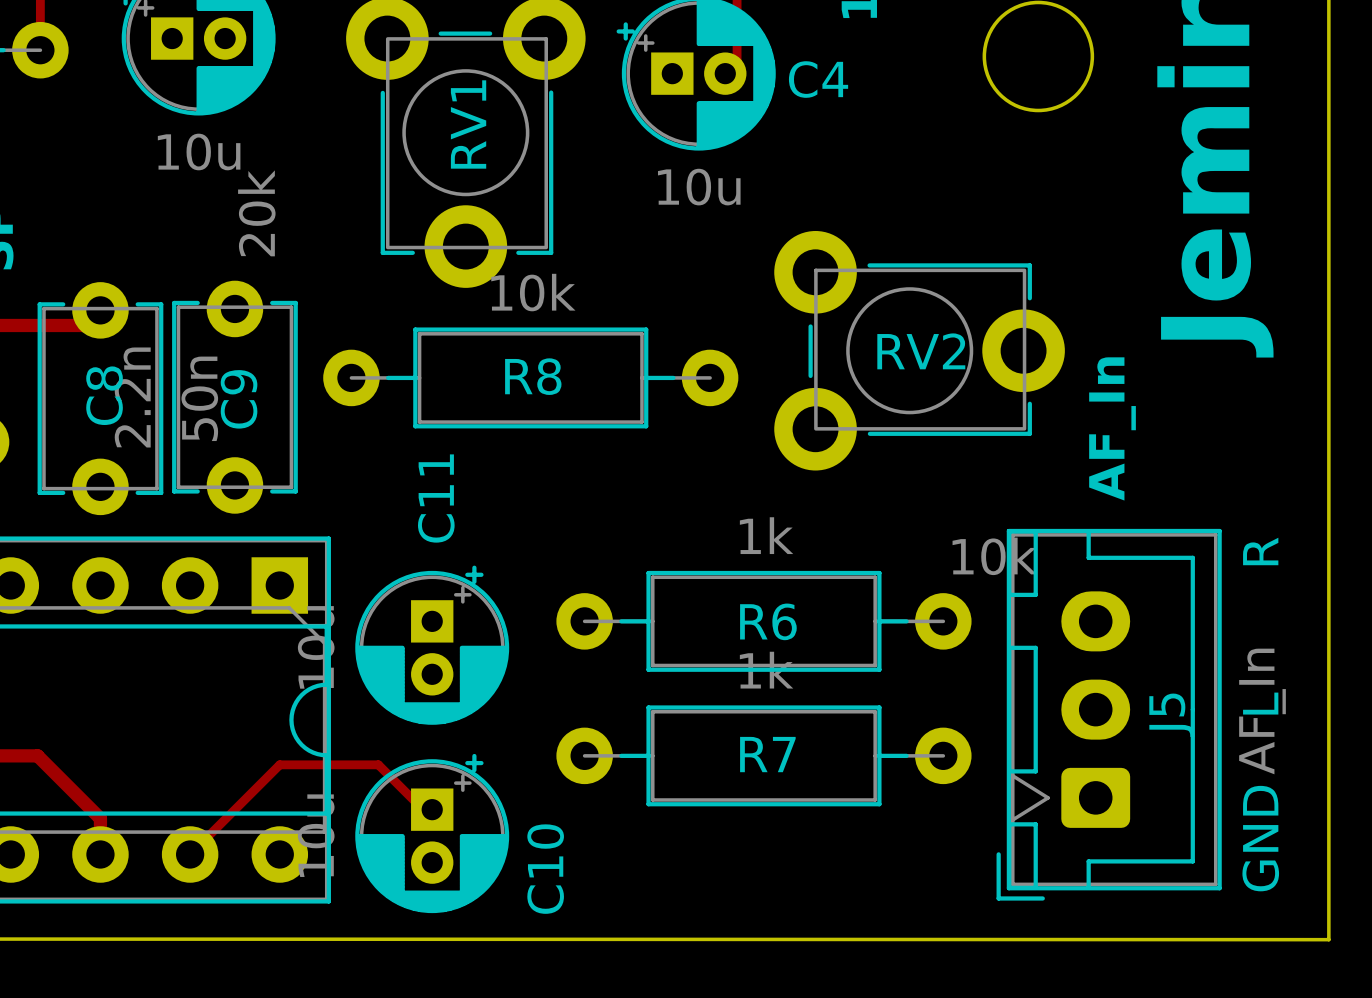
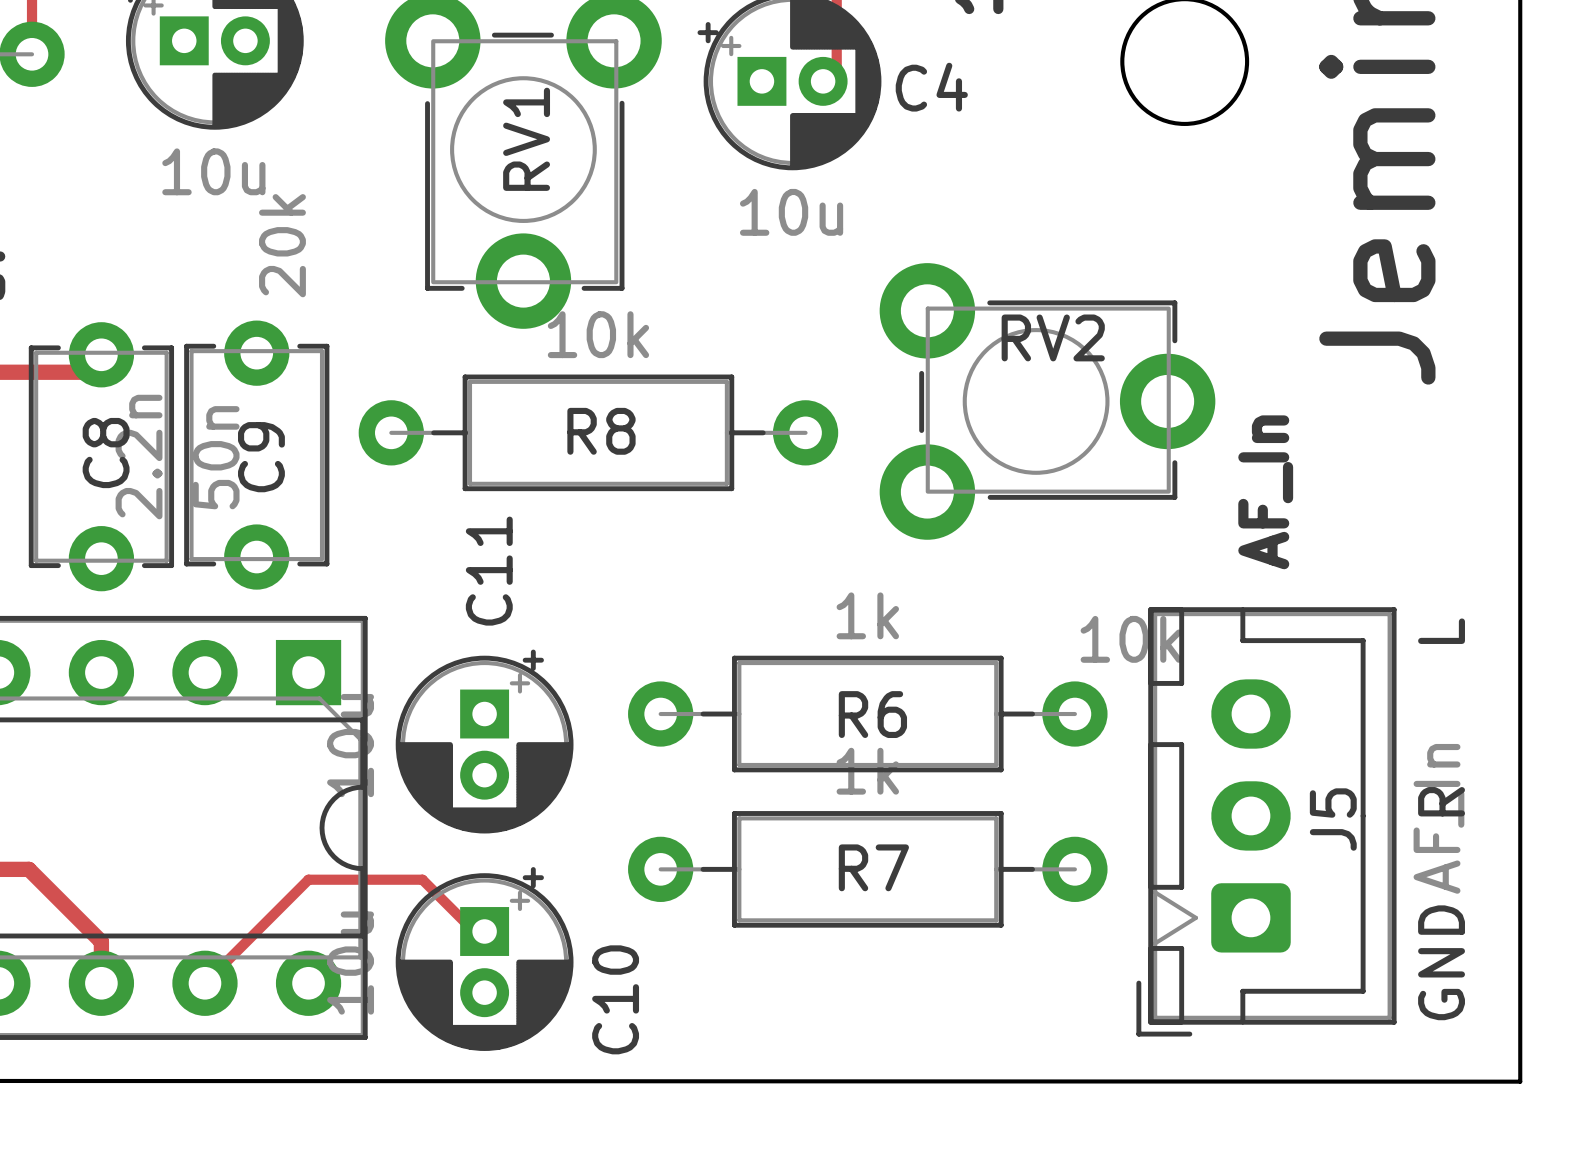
RV2 name position: RV2 (921, 351) -> RV2 (1053, 337)
text: R (1260, 551) -> L (1441, 631)
text: L (1260, 703) -> R (1441, 801)

